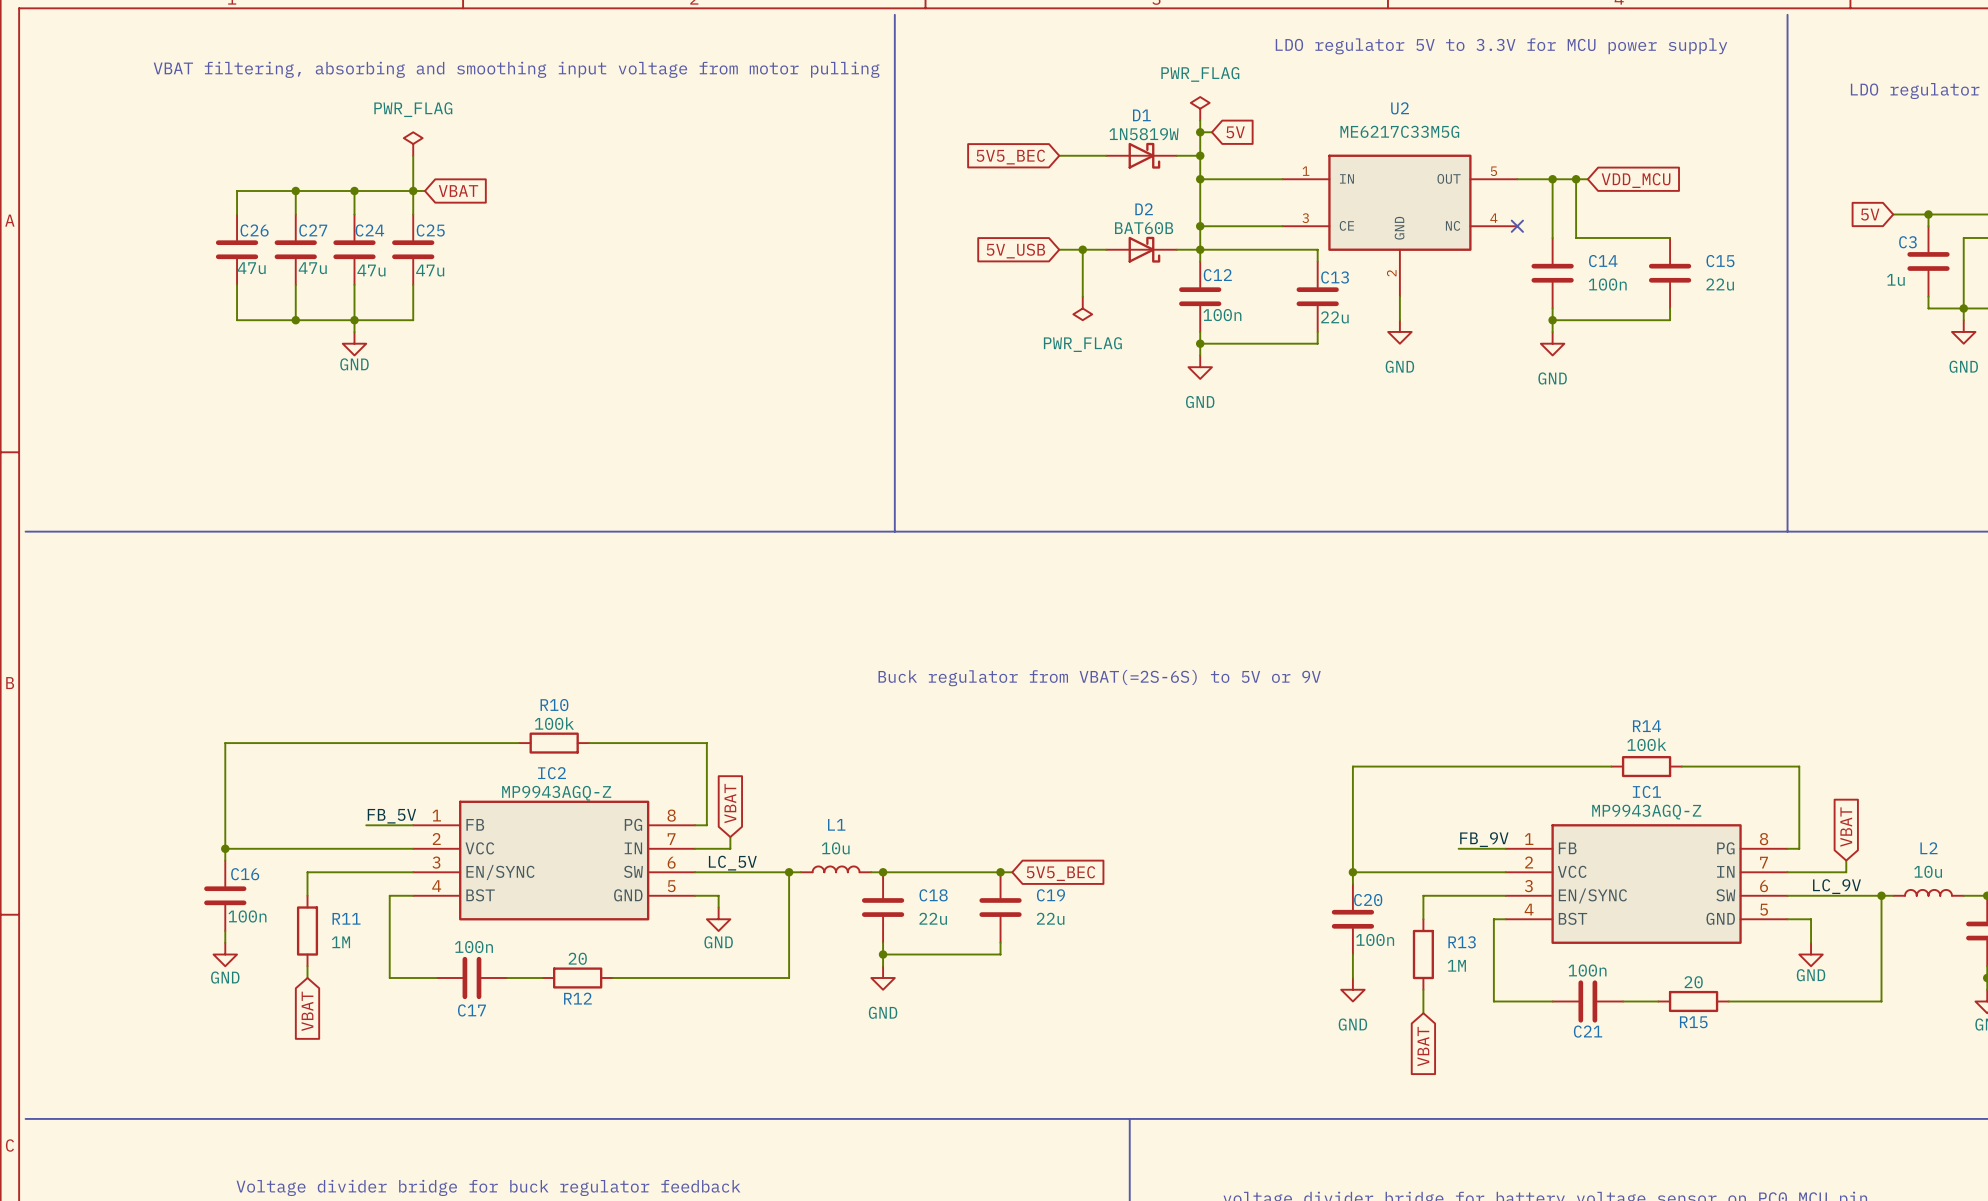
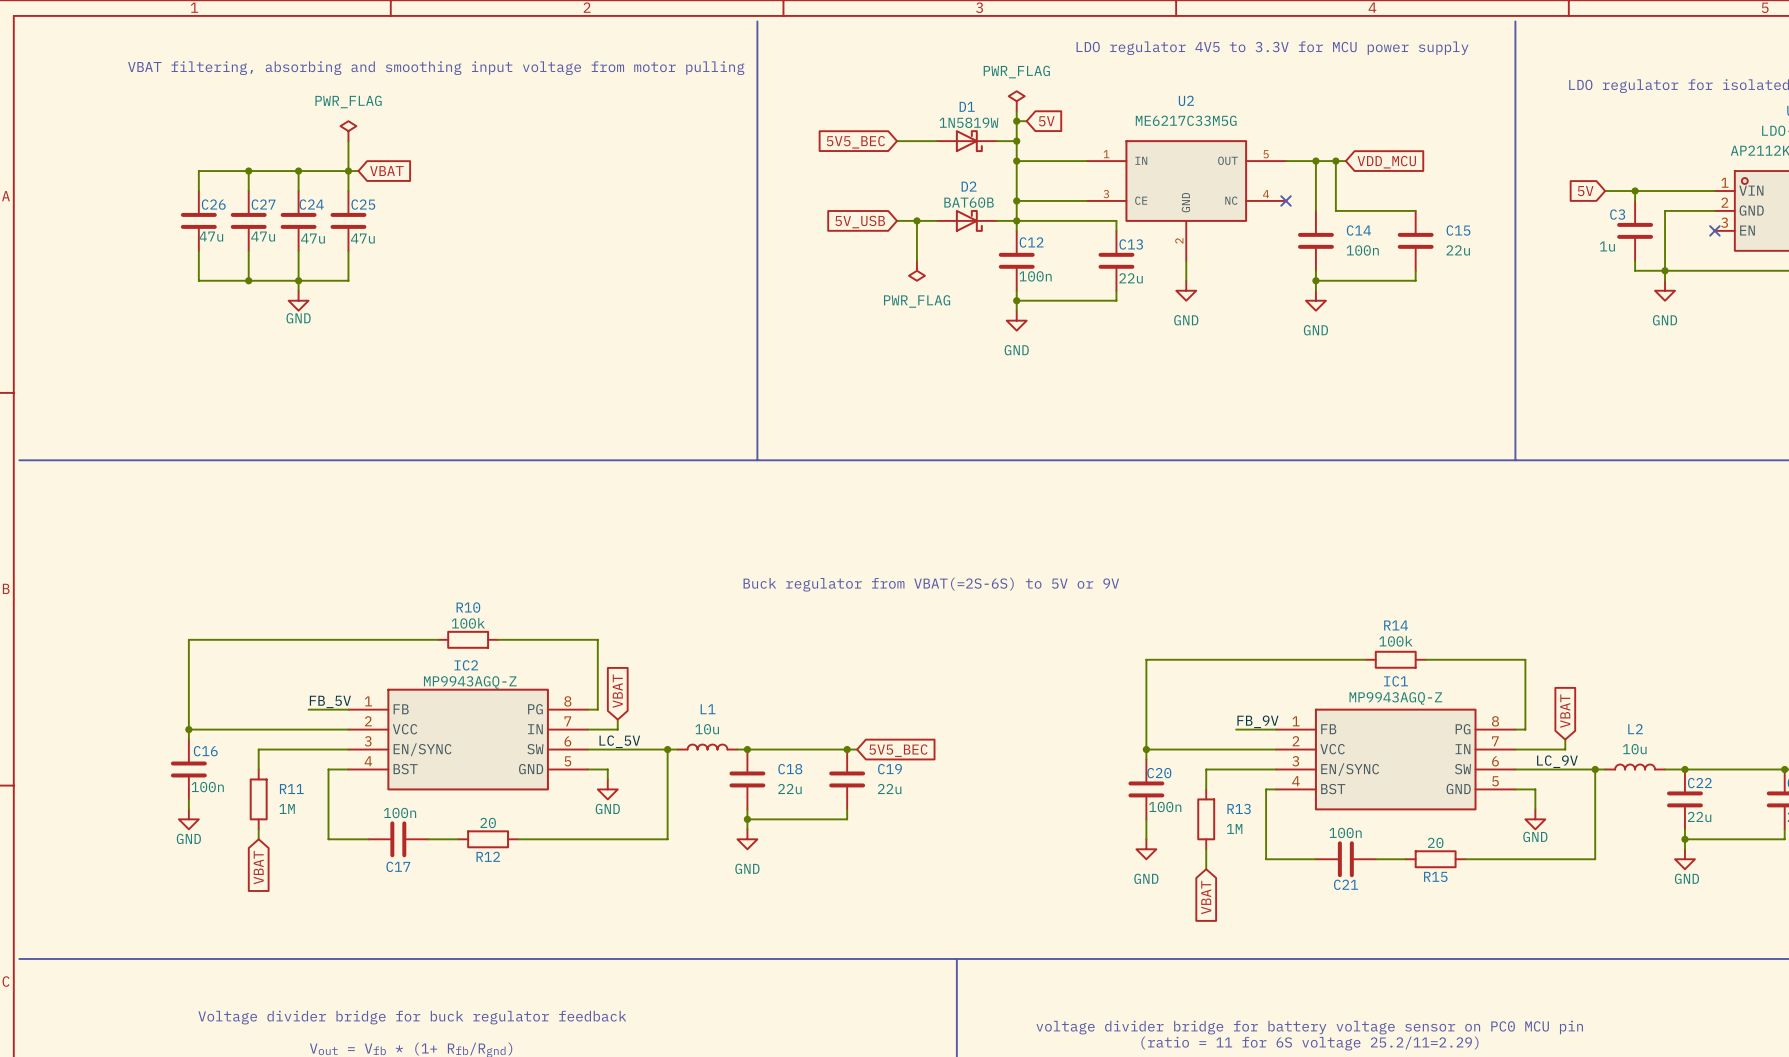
text: LDO regulator 5V to 3.3V for MCU power supply (1501, 46) -> LDO regulator 4V5 to 3.3V for MCU power supply (1272, 48)

